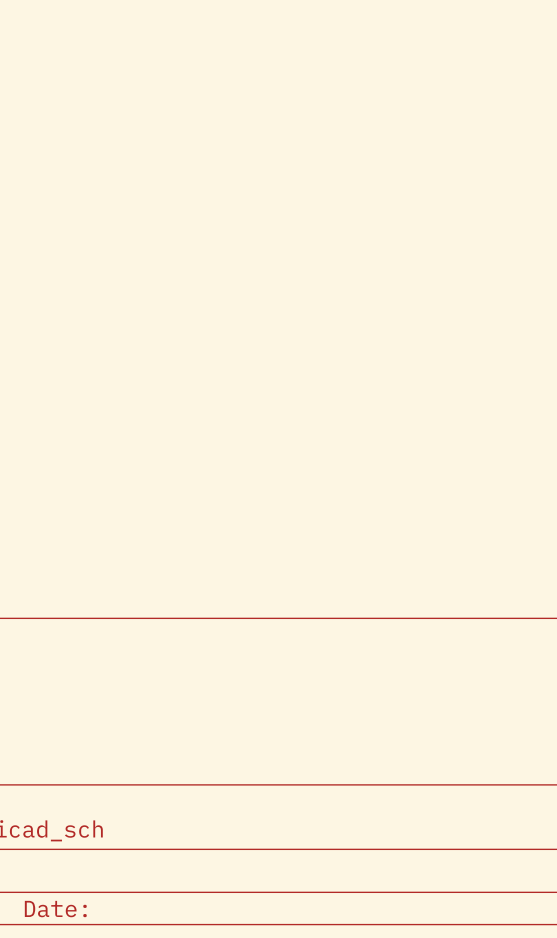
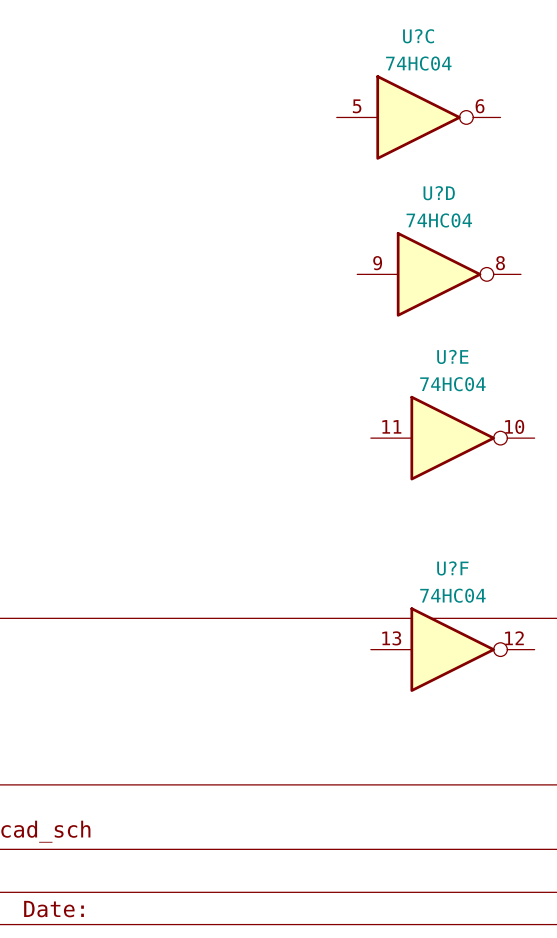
U?C: none -> 74HC04 (418, 117)
U?D: none -> 74HC04 (439, 274)
U?E: none -> 74HC04 (452, 438)
U?F: none -> 74HC04 (452, 649)

